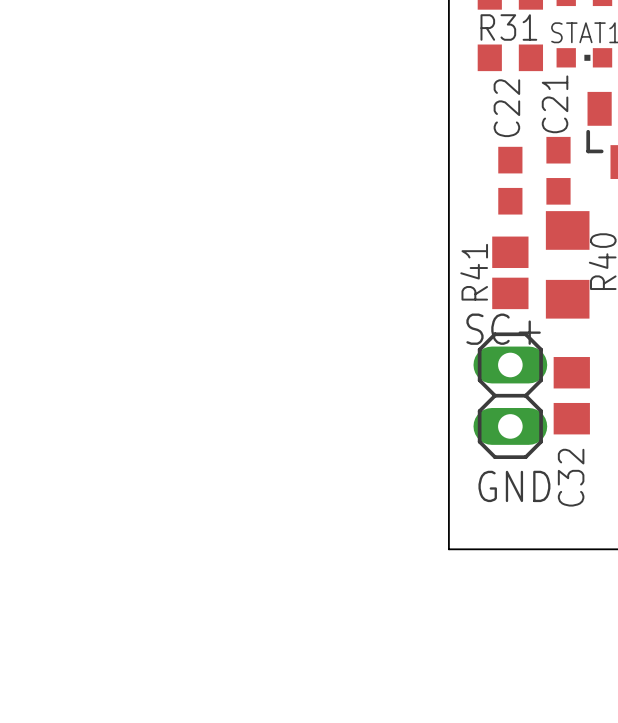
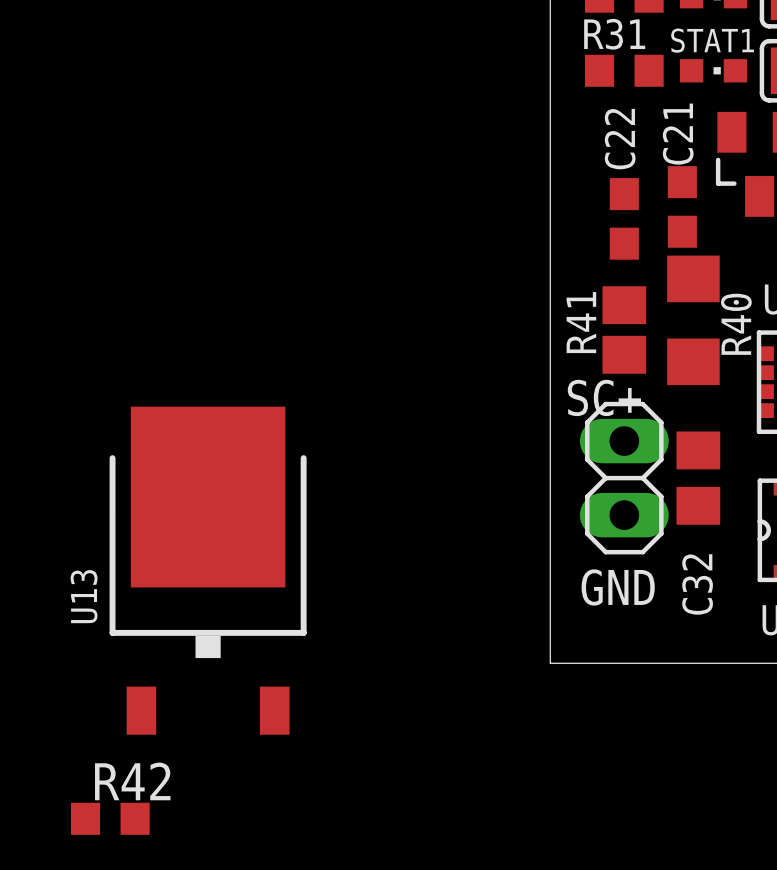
U13: none -> (208, 570)
R42: none -> (110, 818)

